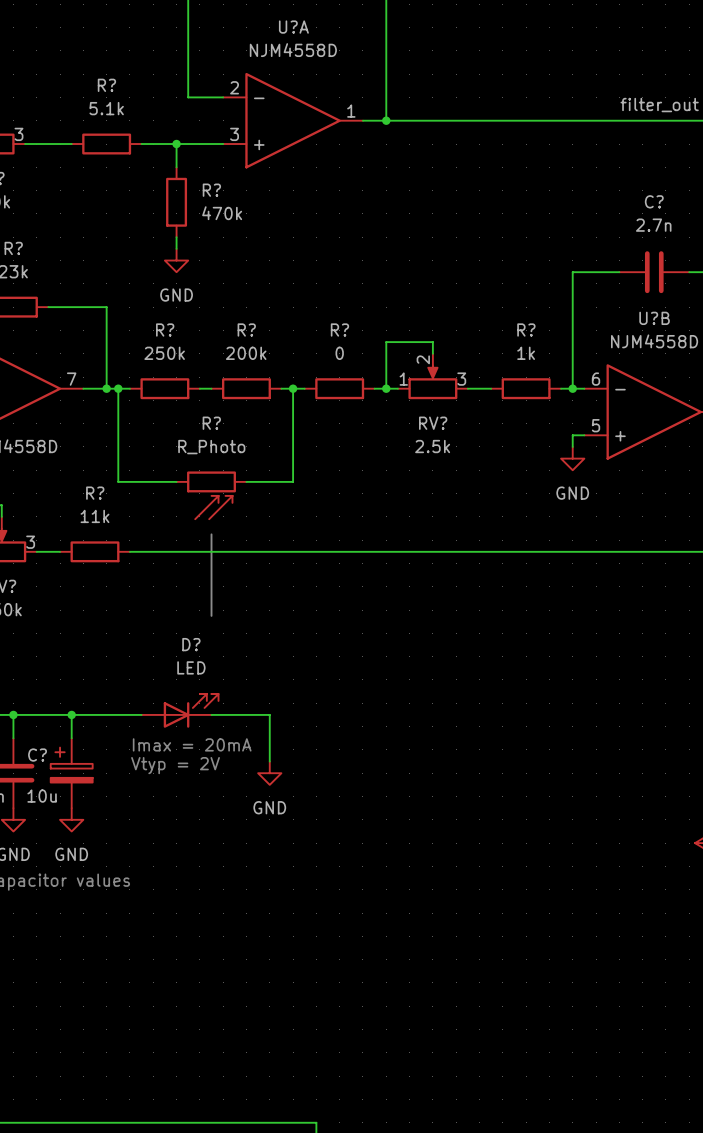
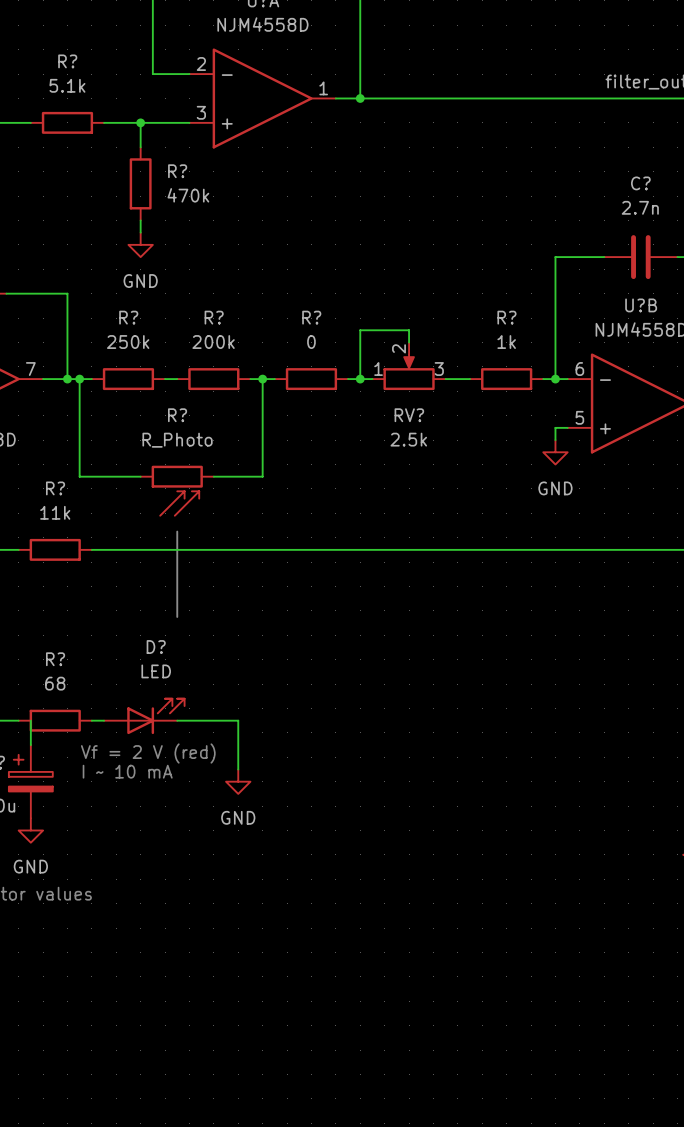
wire: (60, 714) (129, 714) -> none
junction: (71, 714) -> none
R?: none -> 68 (55, 720)
text: Imax = 20mA (192, 744) -> none
text: none -> Vf = 2 V (red) (148, 753)
text: none -> I ~ 10 mA (127, 771)
text: Vtyp = 2V (175, 765) -> none

